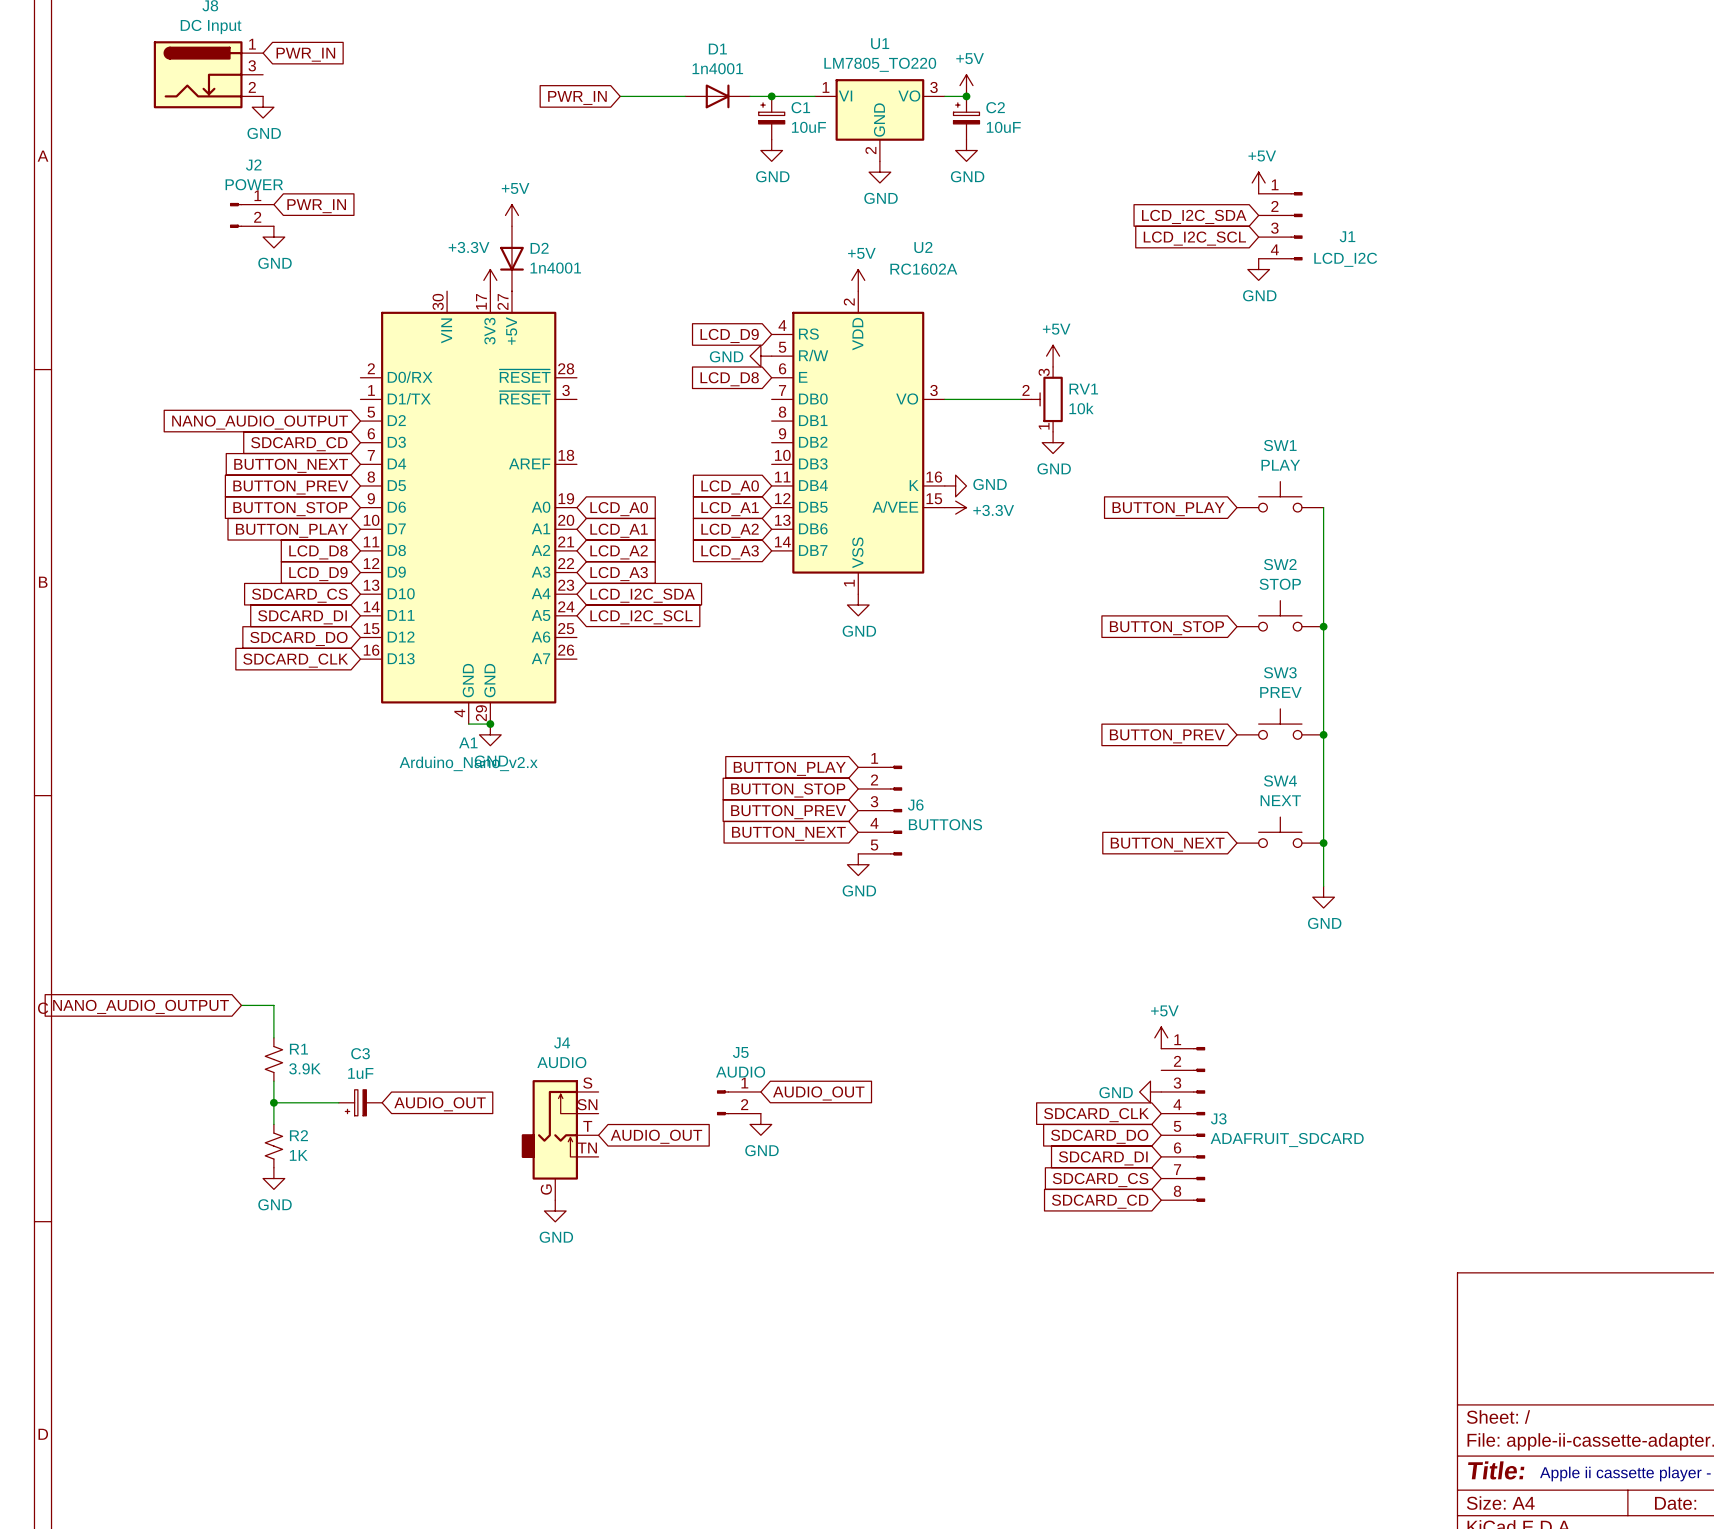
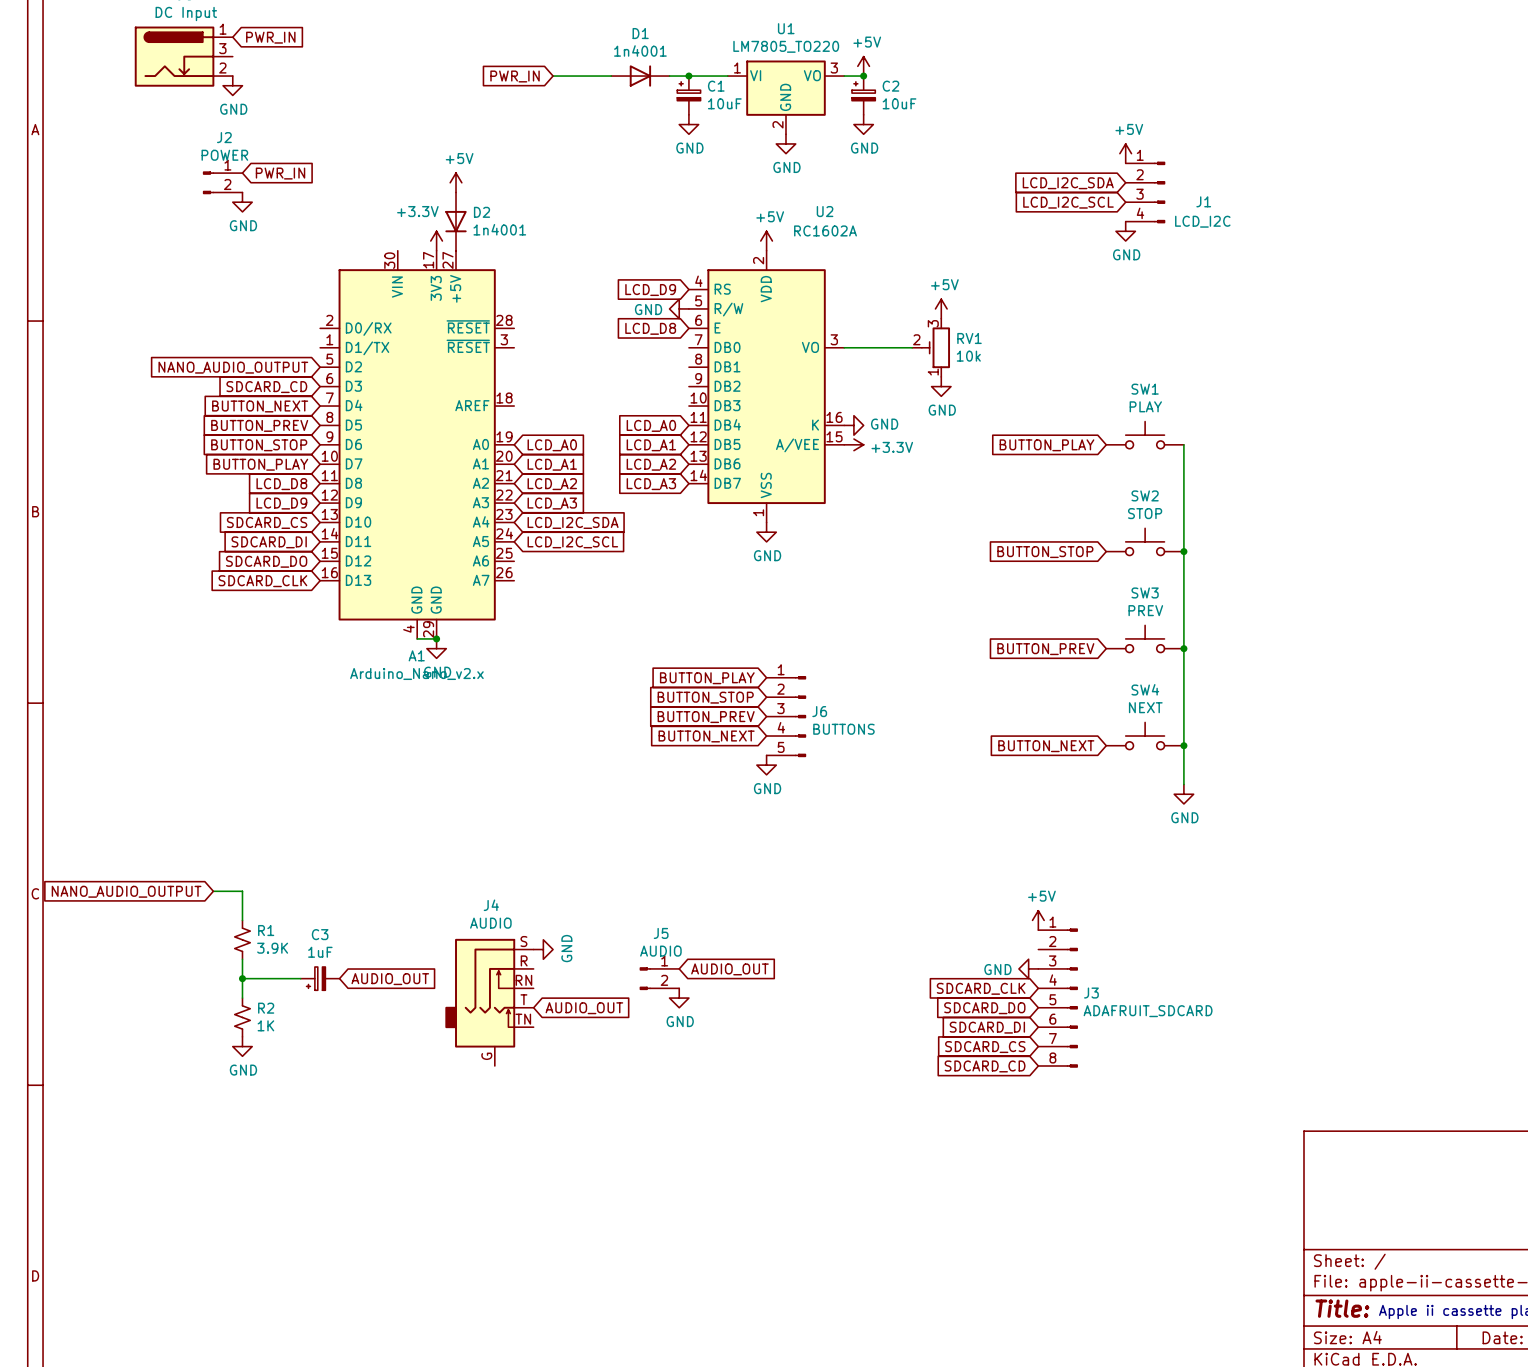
J4 symbol: [521, 1080, 599, 1201] -> [445, 938, 534, 1067]
power symbol rotation: 0° (555, 1211) -> 90° counterclockwise (543, 949)
power symbol position: GND (555, 1211) -> GND (543, 949)

